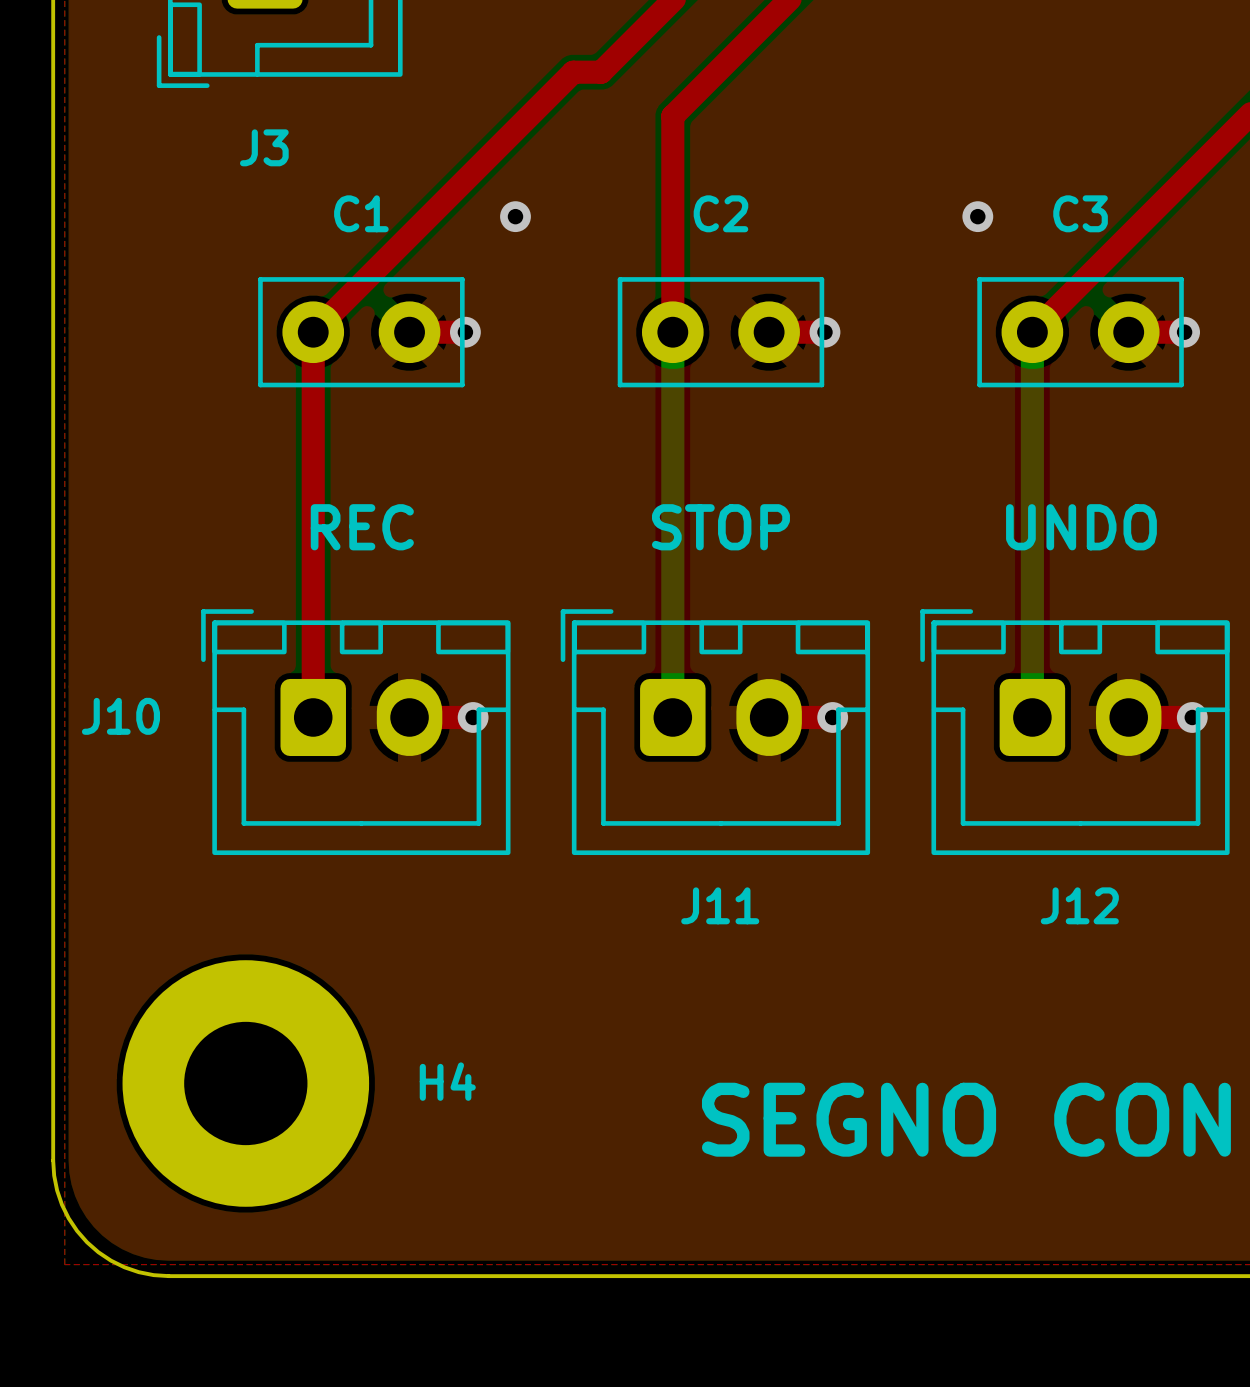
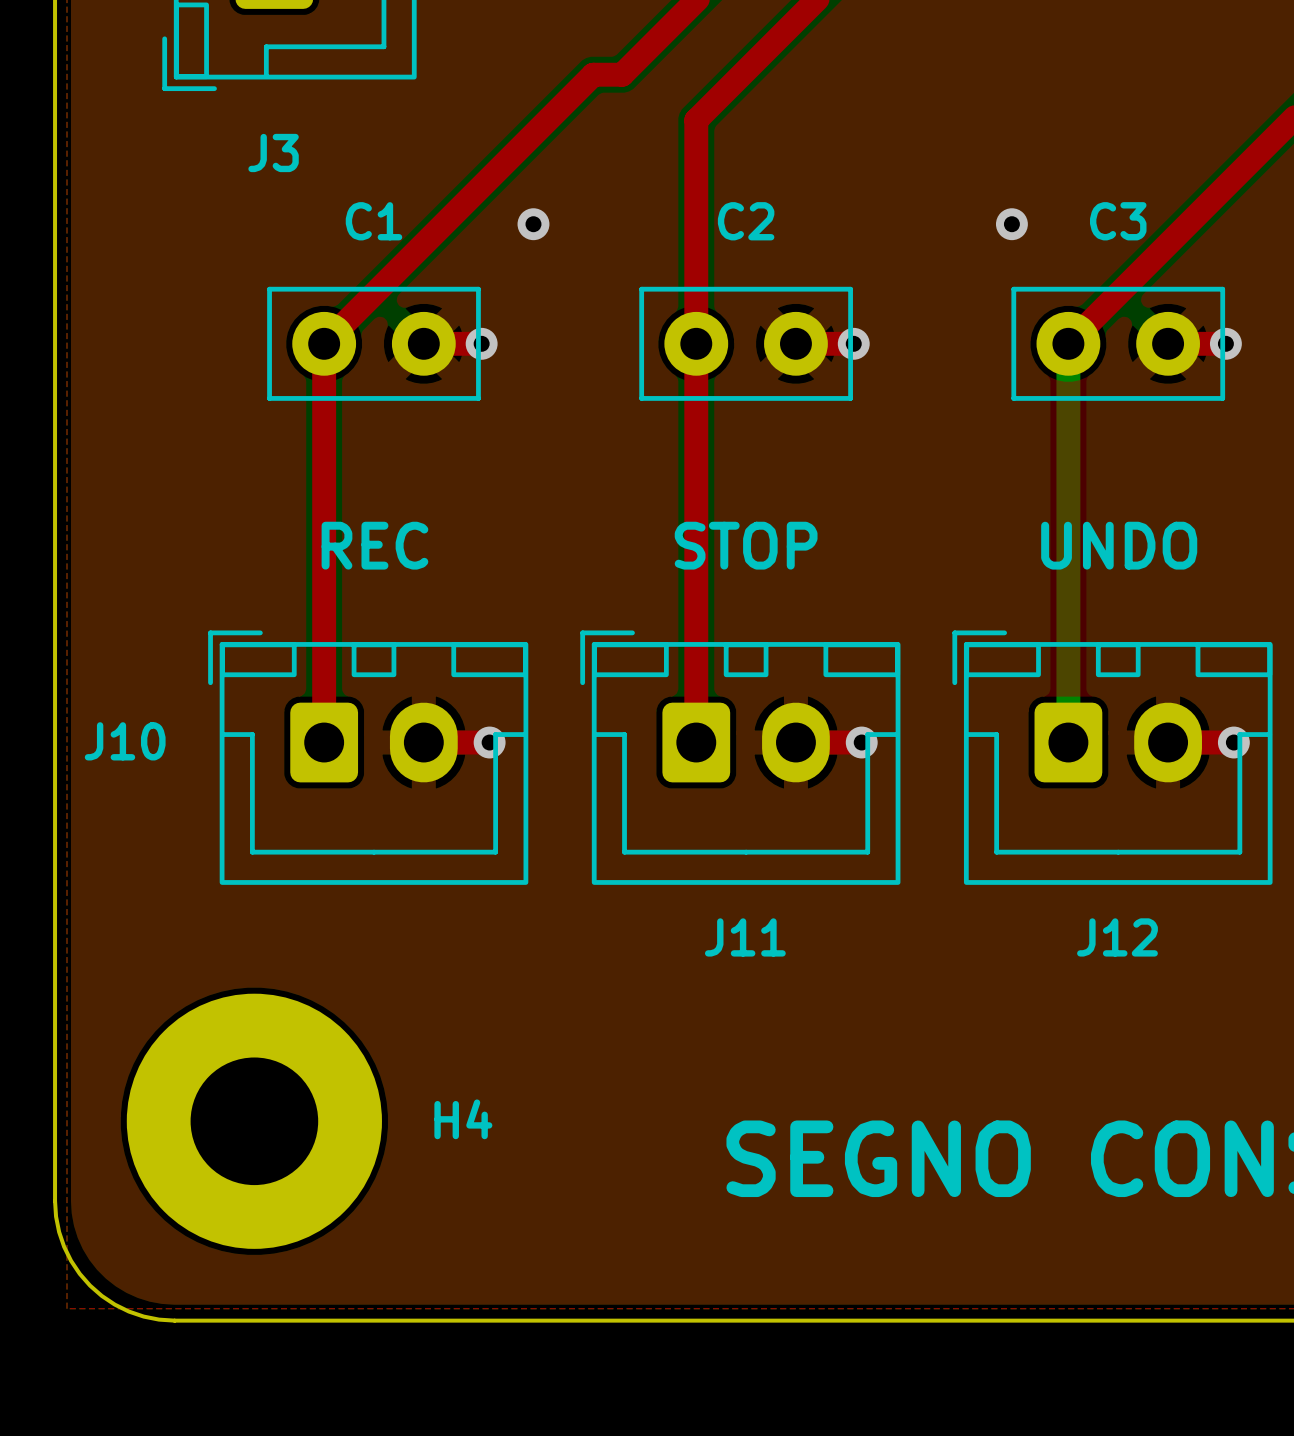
top track: none -> (696, 343) (696, 742)
bottom track: (672, 332) (672, 717) -> none

